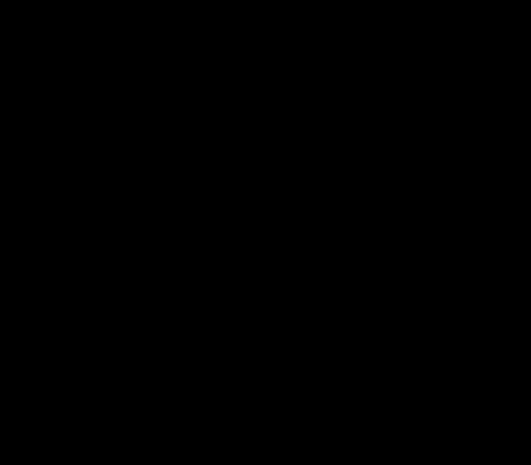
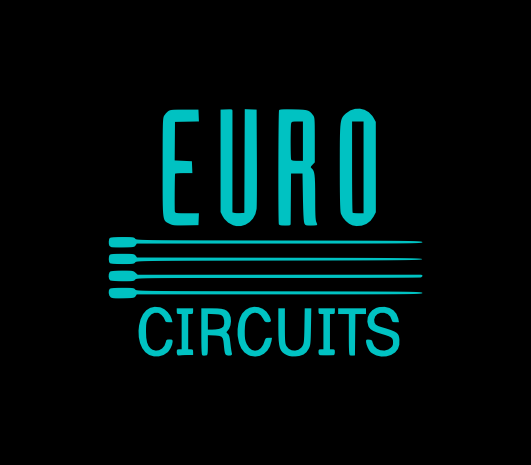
drawing: none -> [108, 108, 423, 357]

